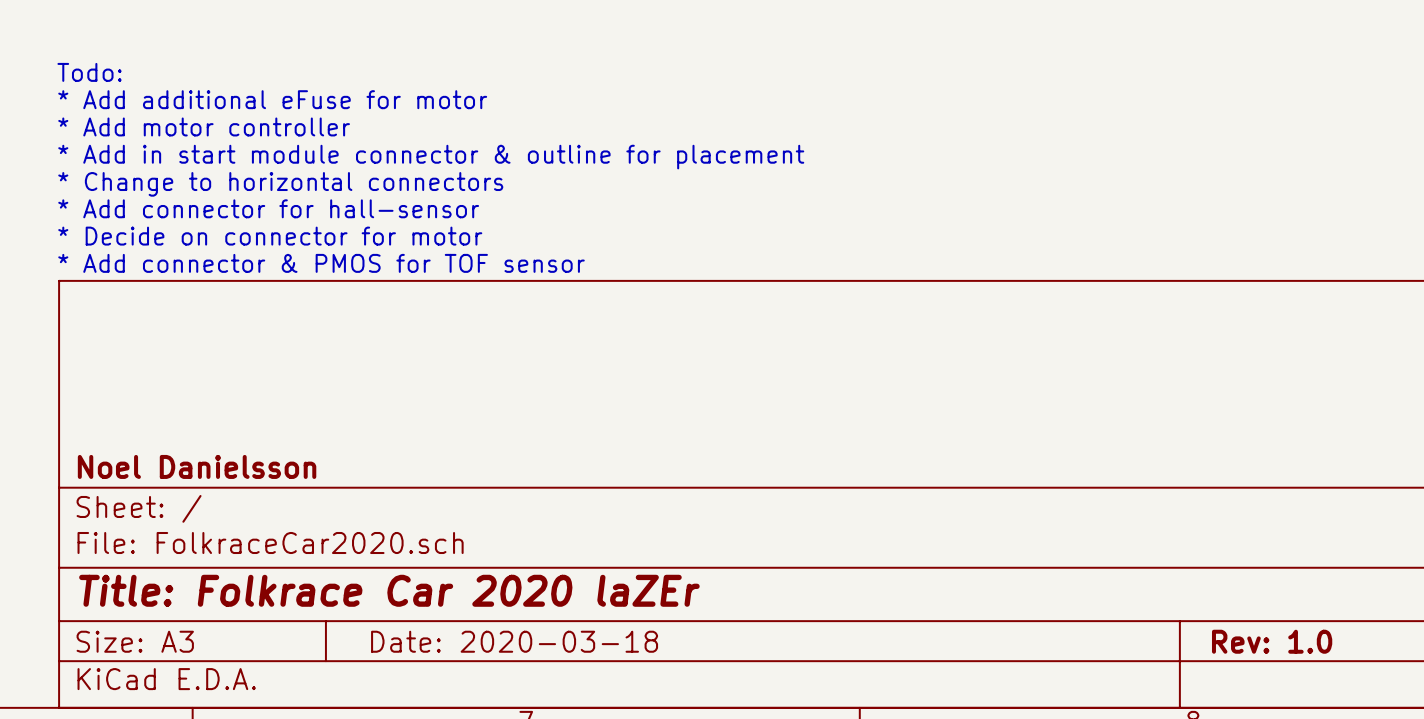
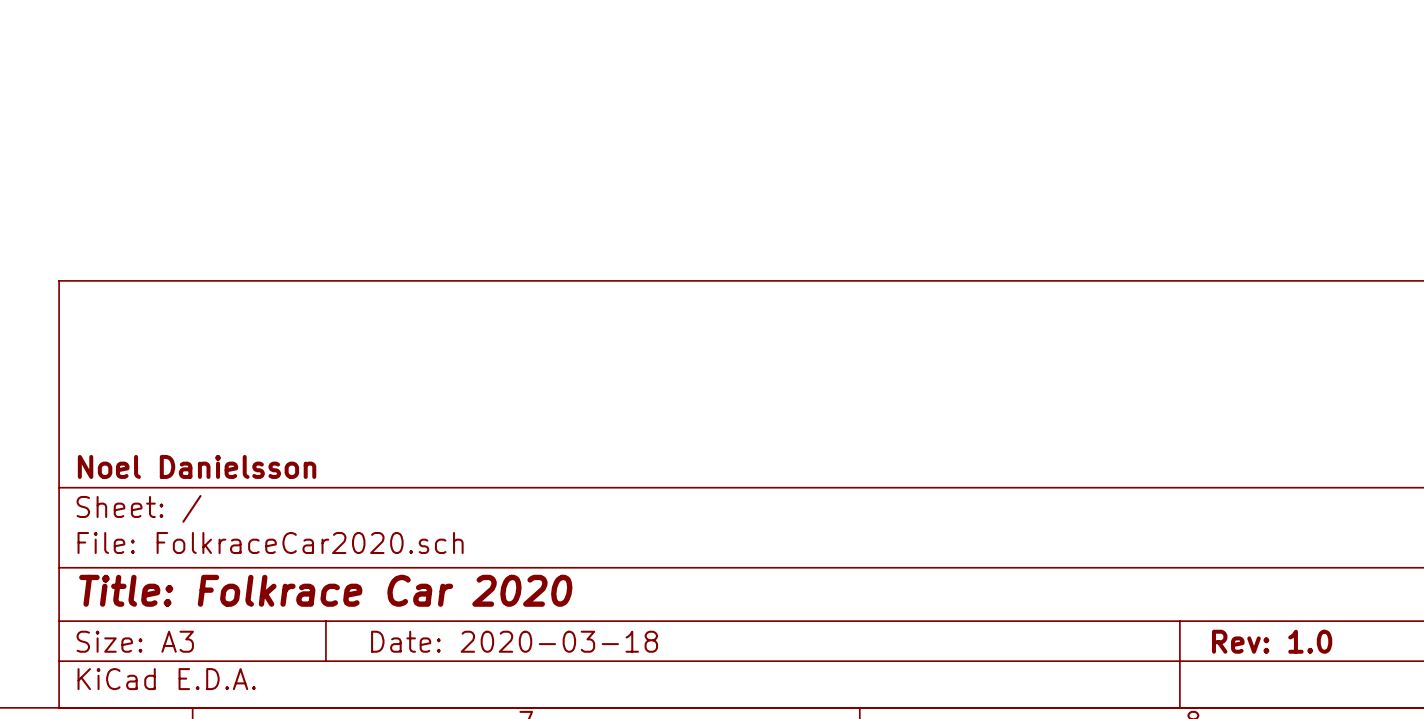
text: Todo: (89, 72) -> none
text: * Add additional eFuse for motor (272, 99) -> none
text: * Add motor controller (204, 126) -> none
text: * Add in start module connector & outline for placement (431, 157) -> none
text: * Change to horizontal connectors (280, 184) -> none
text: * Add connector for hall-sensor (268, 208) -> none
text: * Decide on connector for motor (270, 236) -> none
text: * Add connector & PMOS for TOF sensor (321, 263) -> none
title block: Title: Folkrace Car 2020 laZEr (389, 590) -> Title: Folkrace Car 2020 (325, 590)

